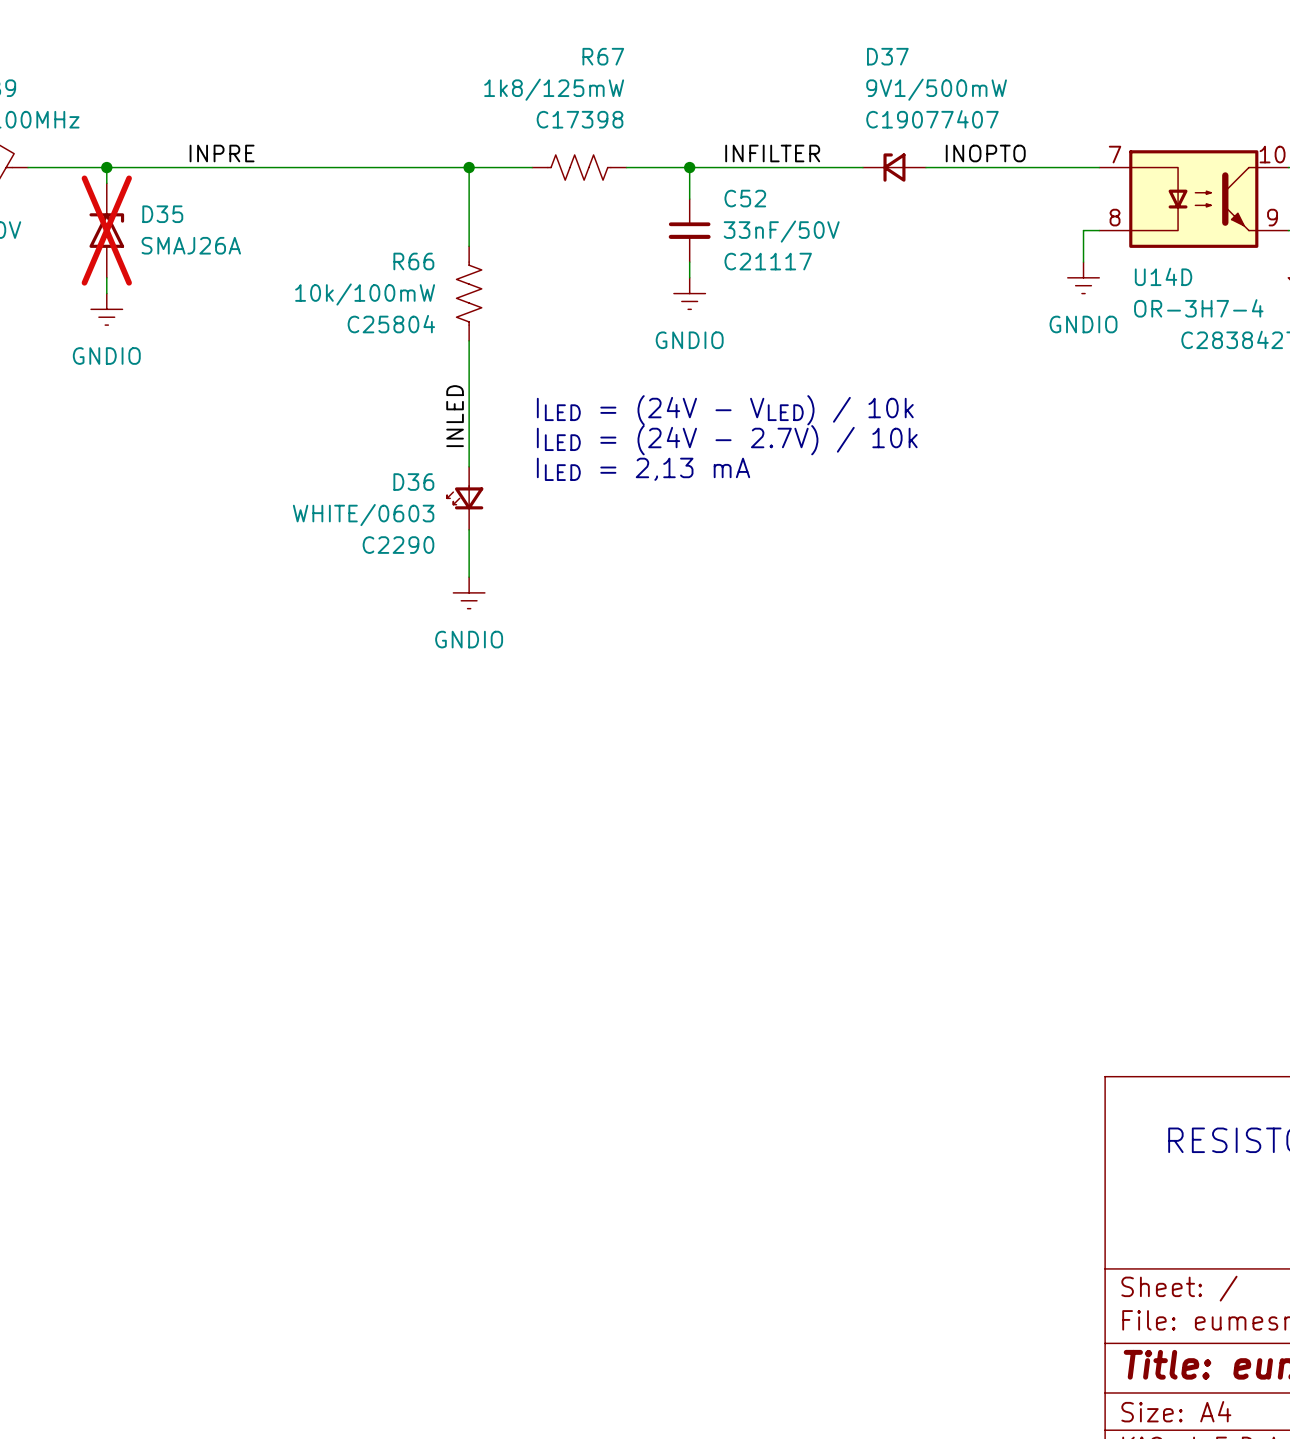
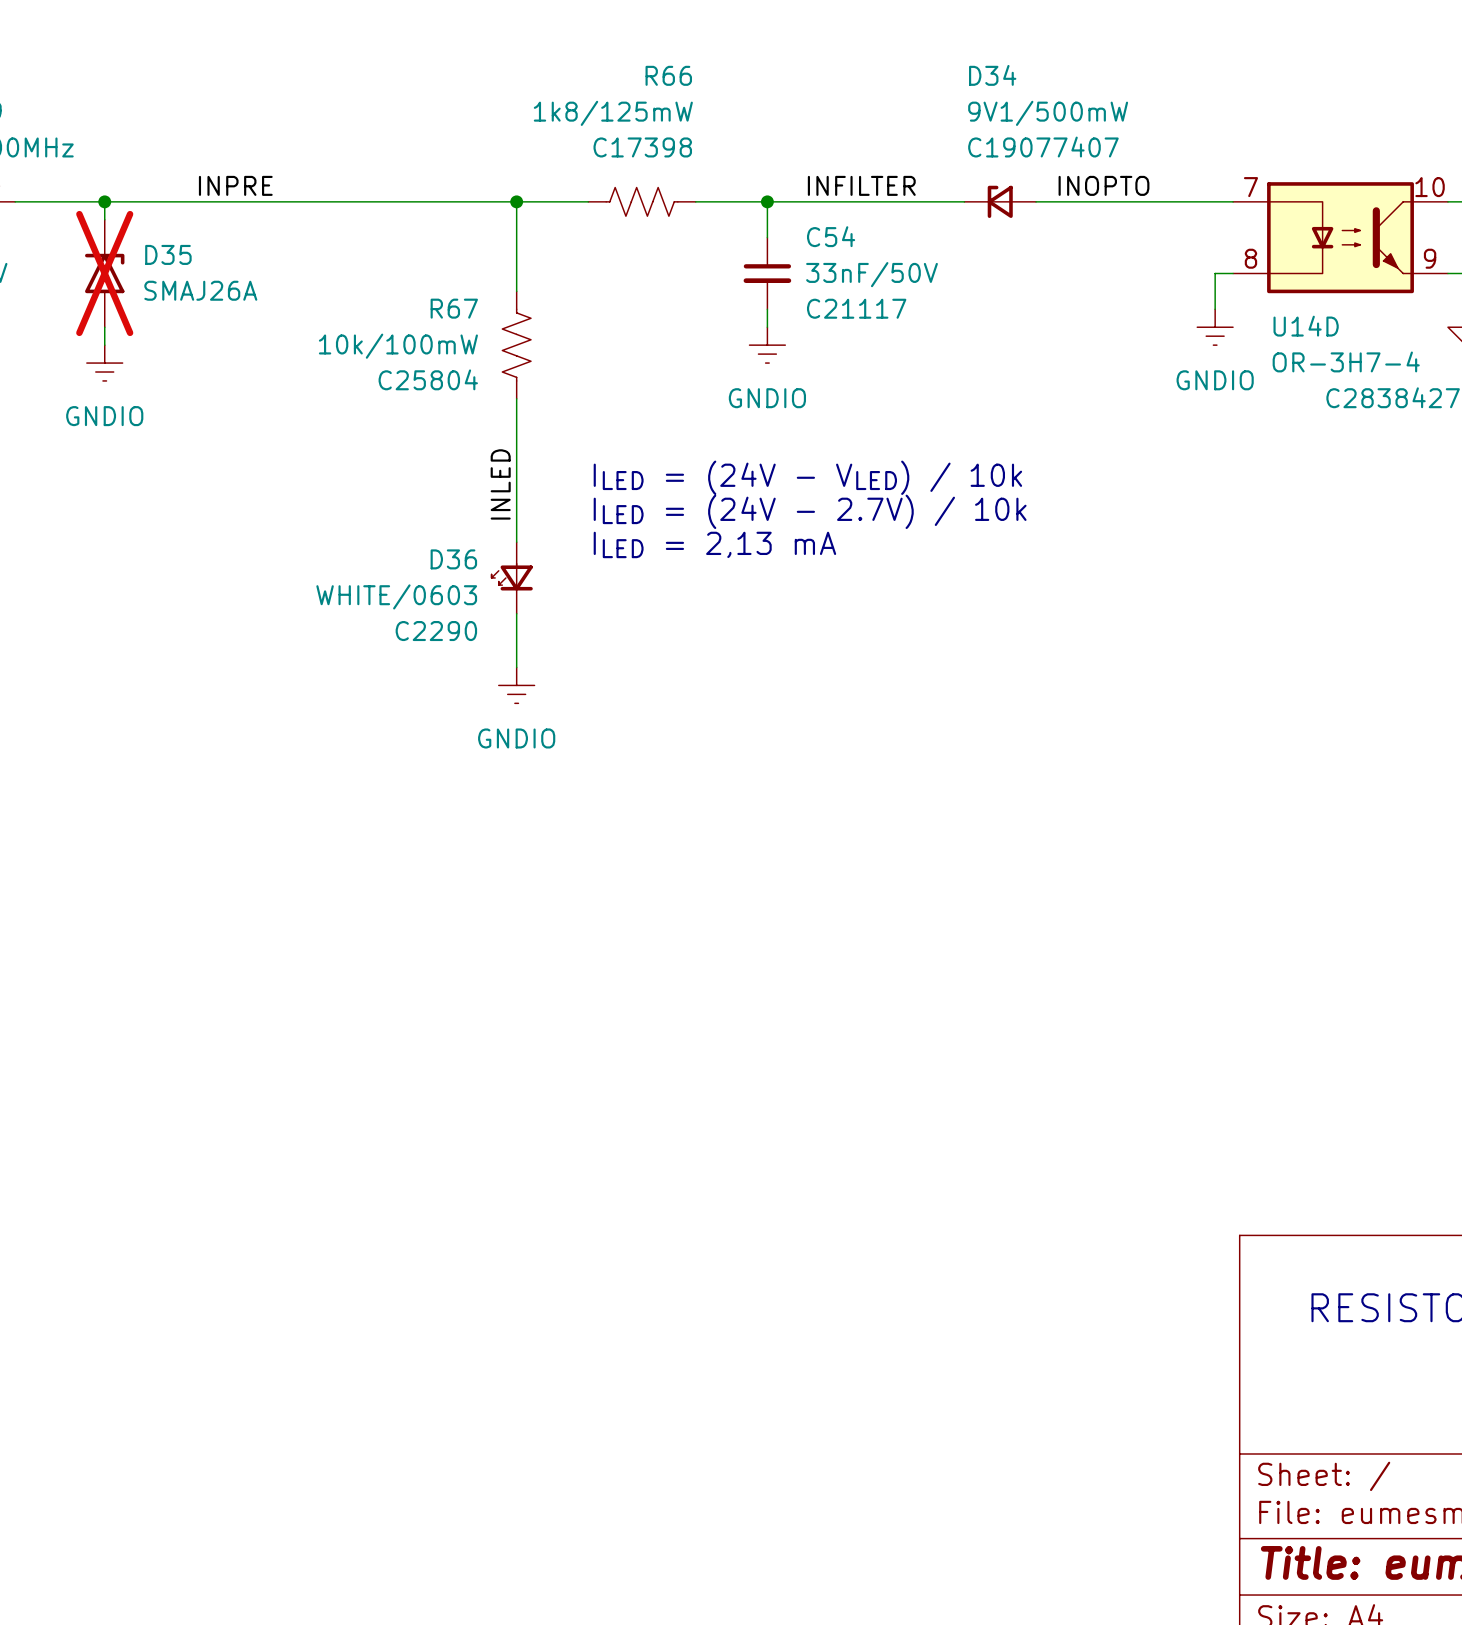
R67 name: R67 (603, 56) -> R66 (668, 75)
D37 name: D37 (887, 56) -> D34 (992, 75)
C52 name: C52 (745, 198) -> C54 (831, 236)
R66 name: R66 (413, 261) -> R67 (454, 308)

